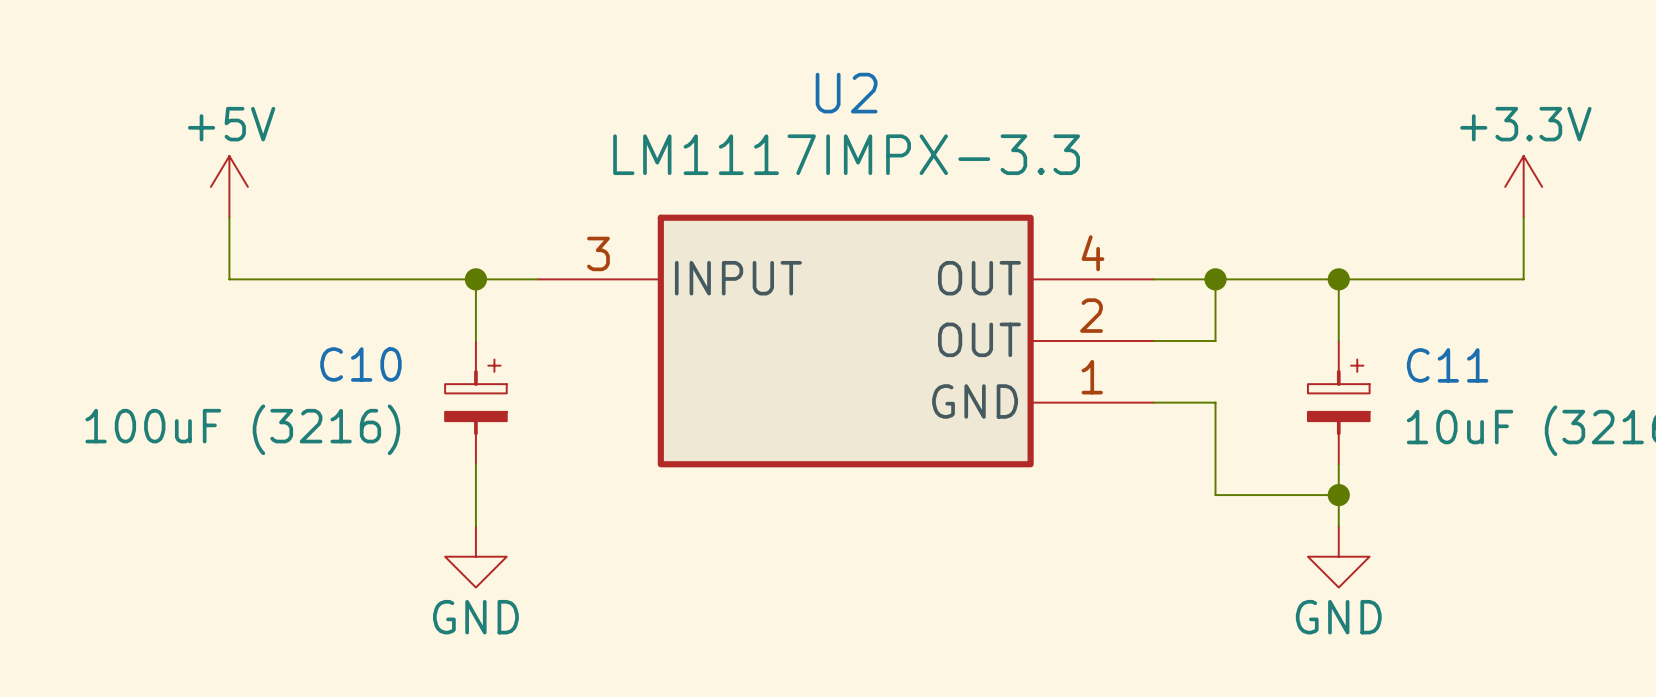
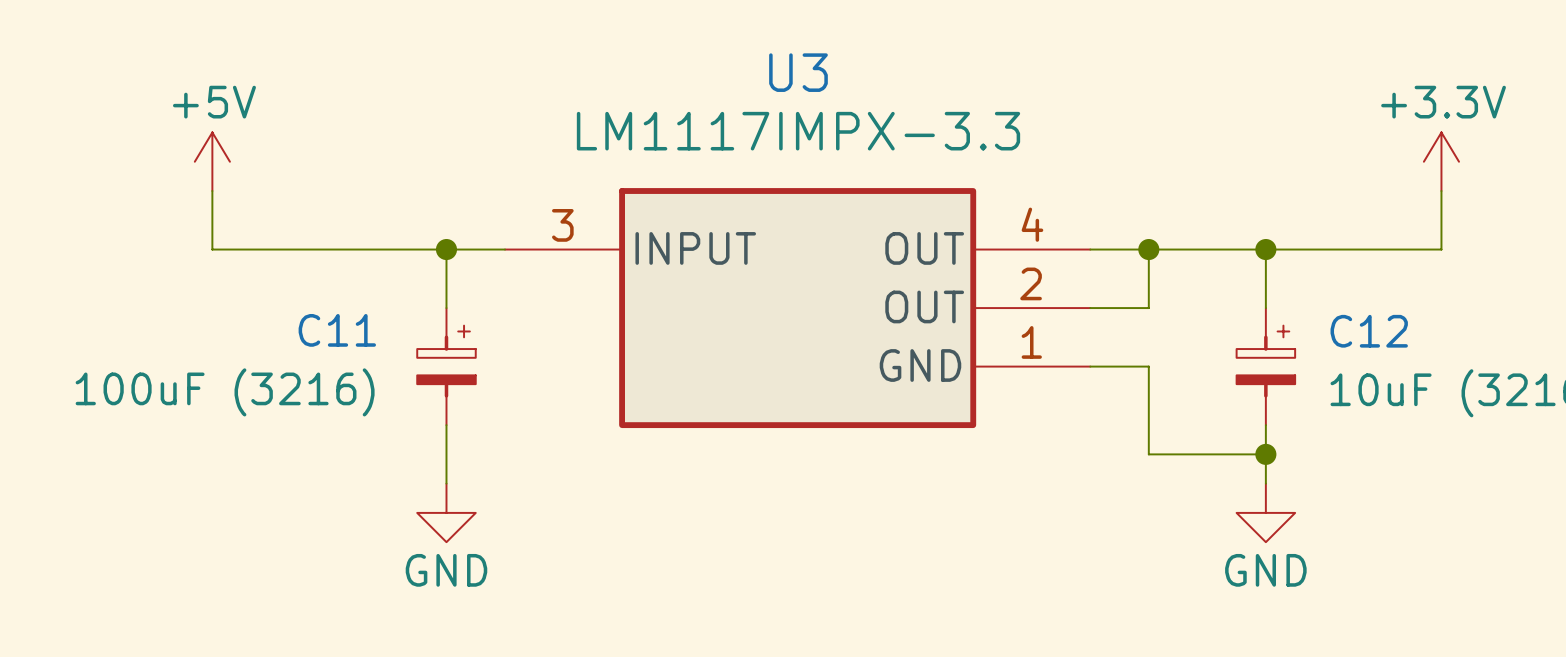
U2 name: U2 (846, 93) -> U3 (798, 72)
C10 name: C10 (360, 364) -> C11 (337, 330)
C11 name: C11 (1447, 365) -> C12 (1369, 331)

